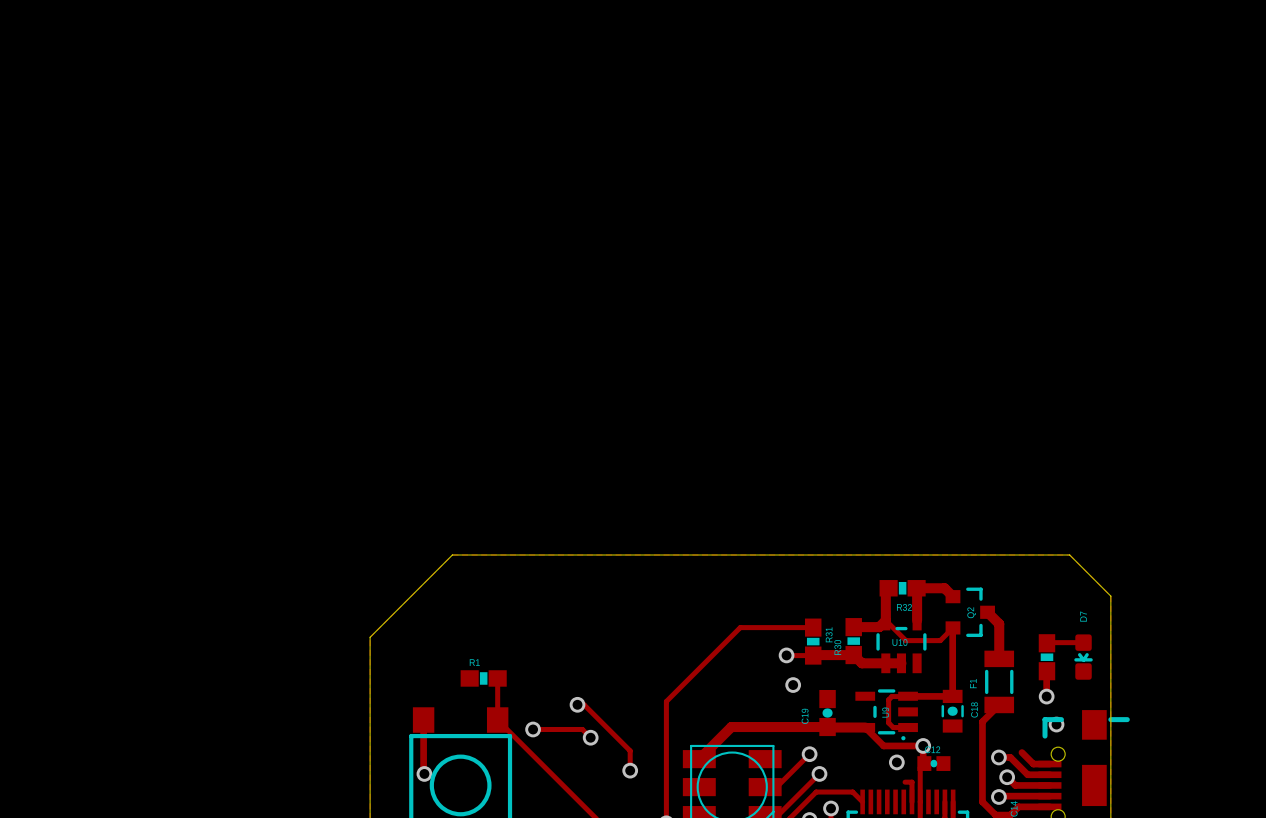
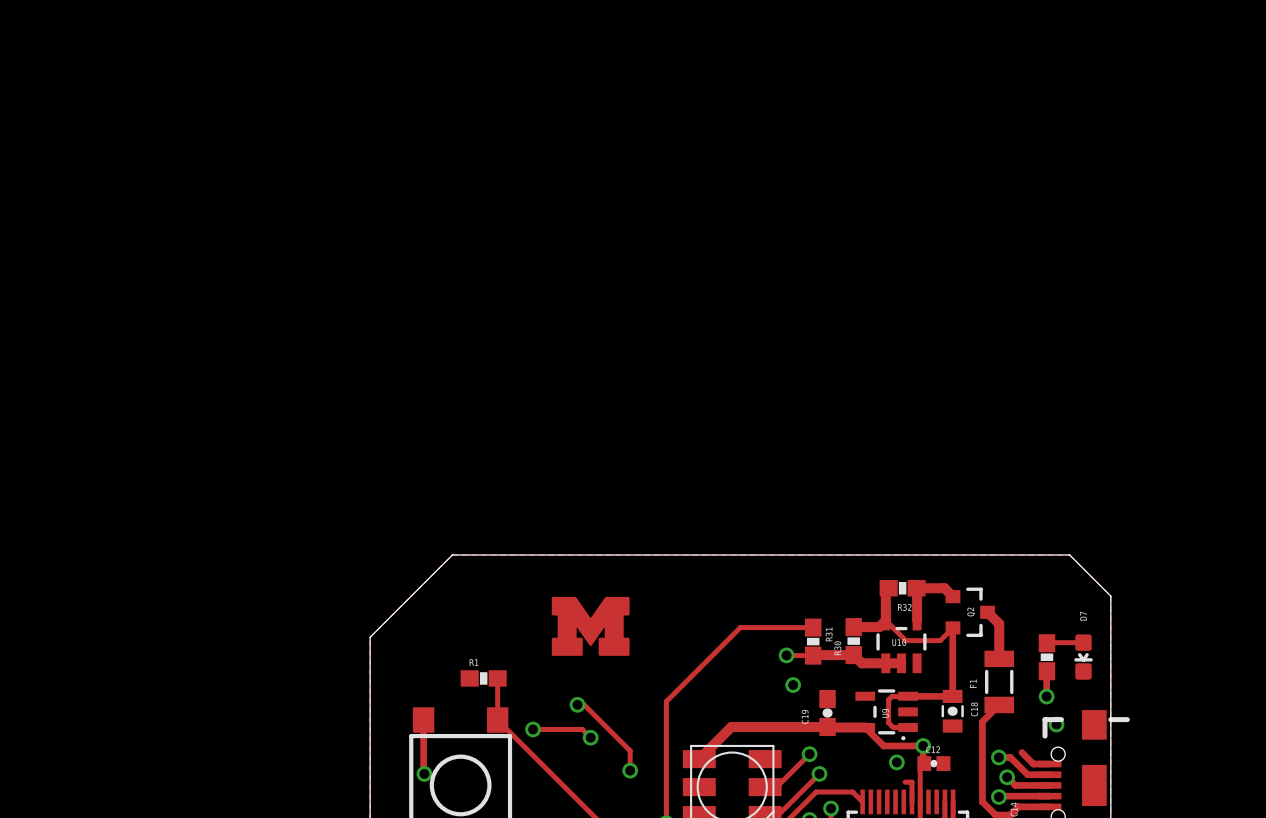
drawing: none -> [551, 596, 630, 656]

